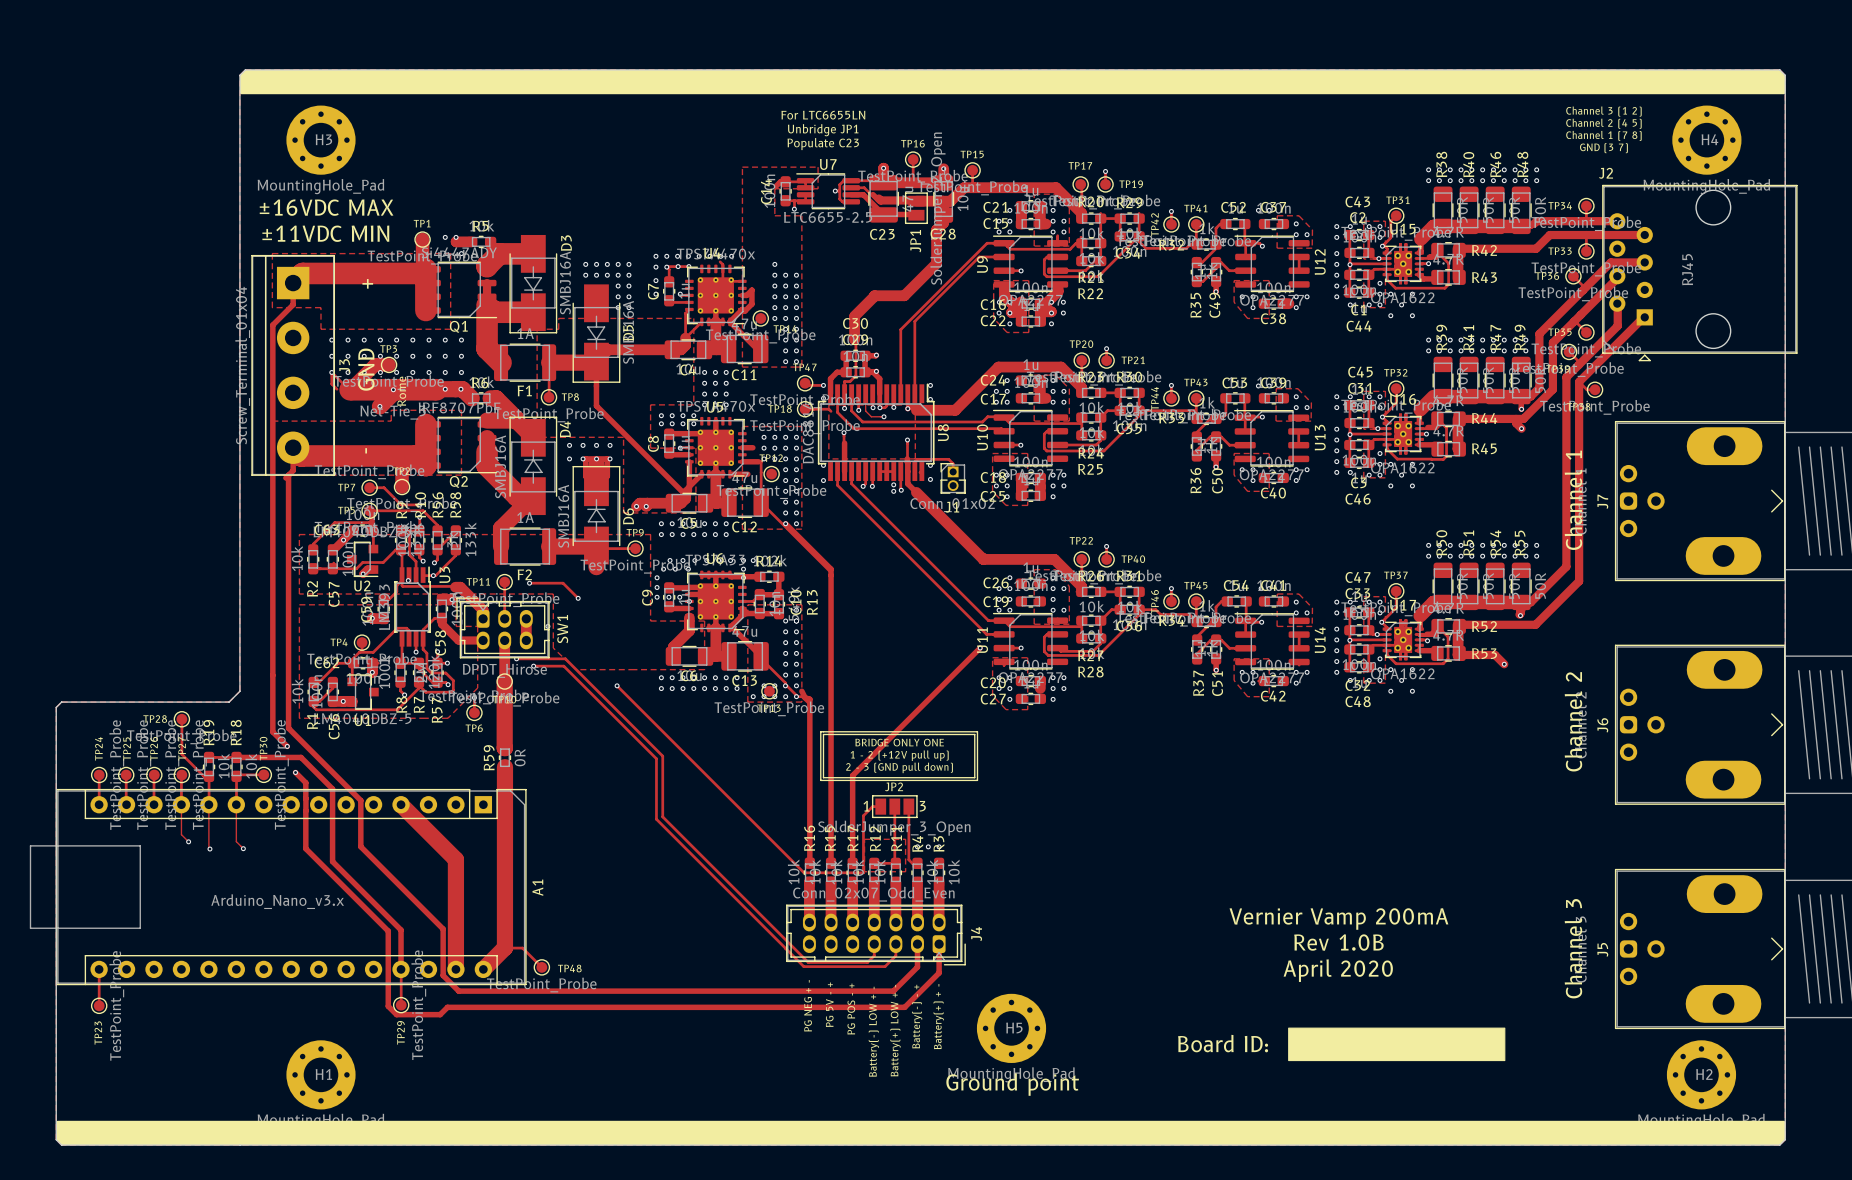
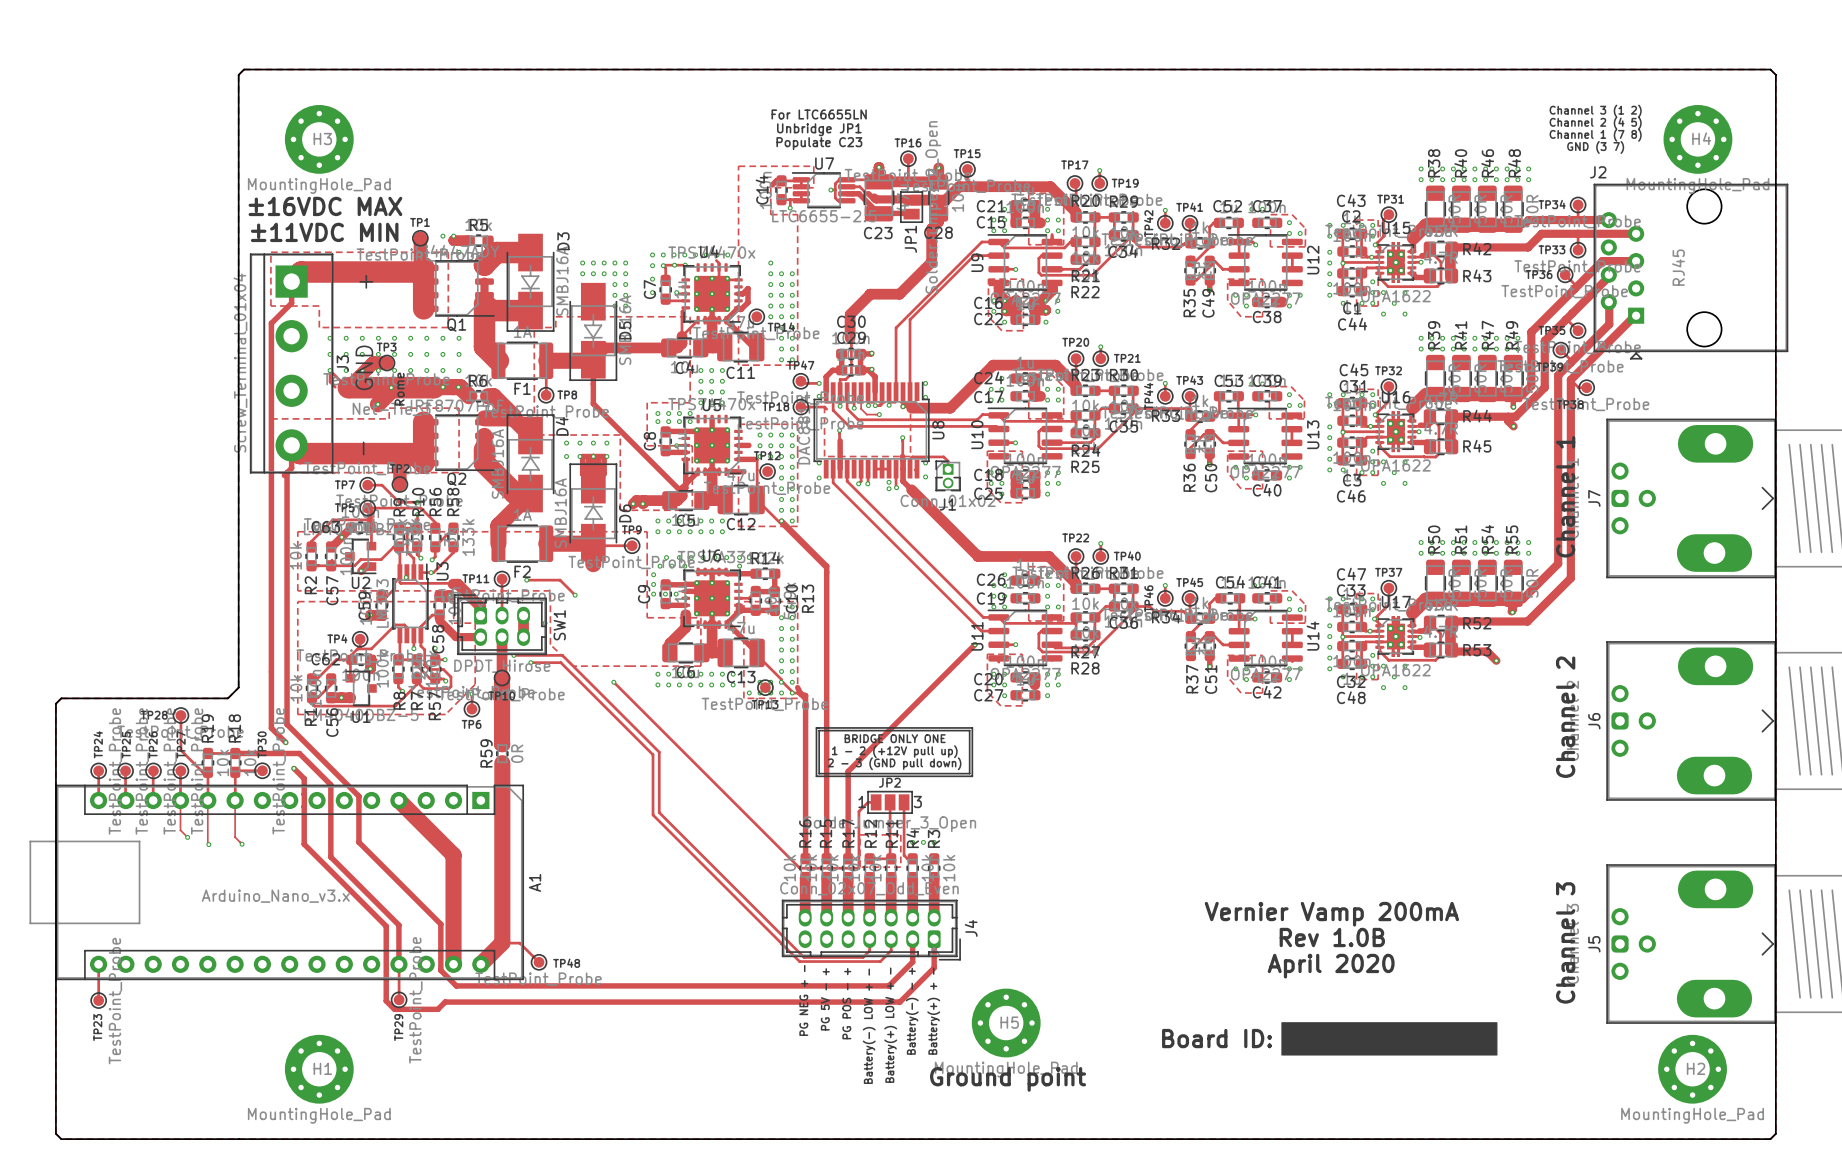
drawing: [239, 69, 1786, 95] -> none
drawing: [56, 1120, 1786, 1146] -> none

